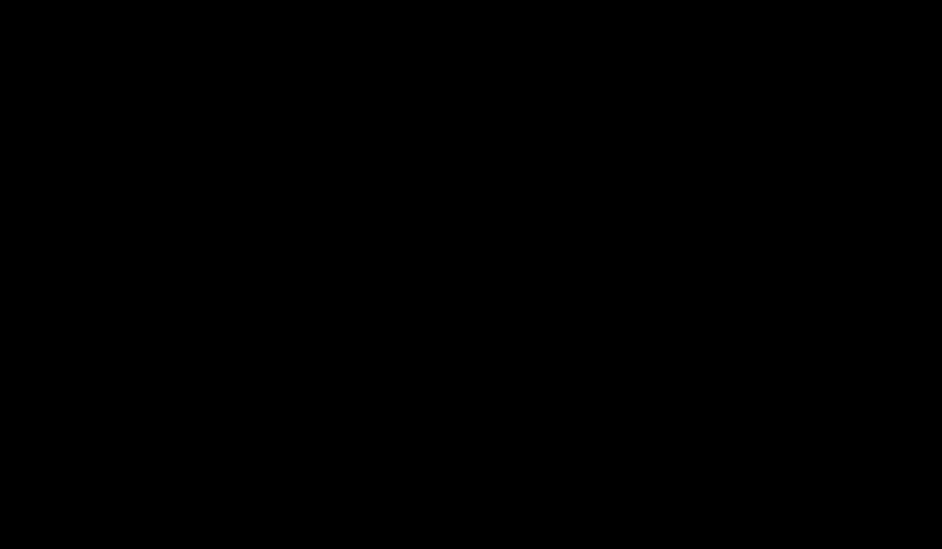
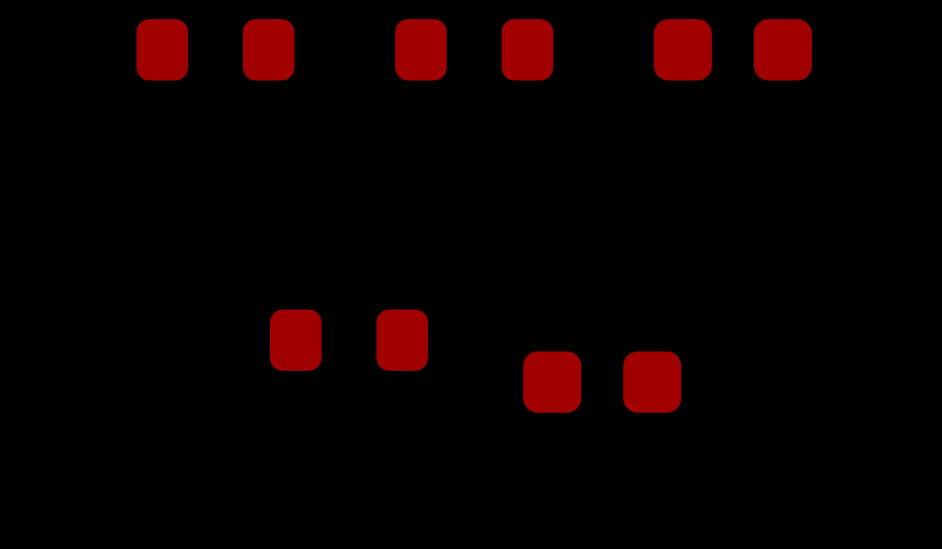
part: none -> (215, 49)
part: none -> (474, 49)
part: none -> (732, 49)
part: none -> (349, 340)
part: none -> (602, 382)

